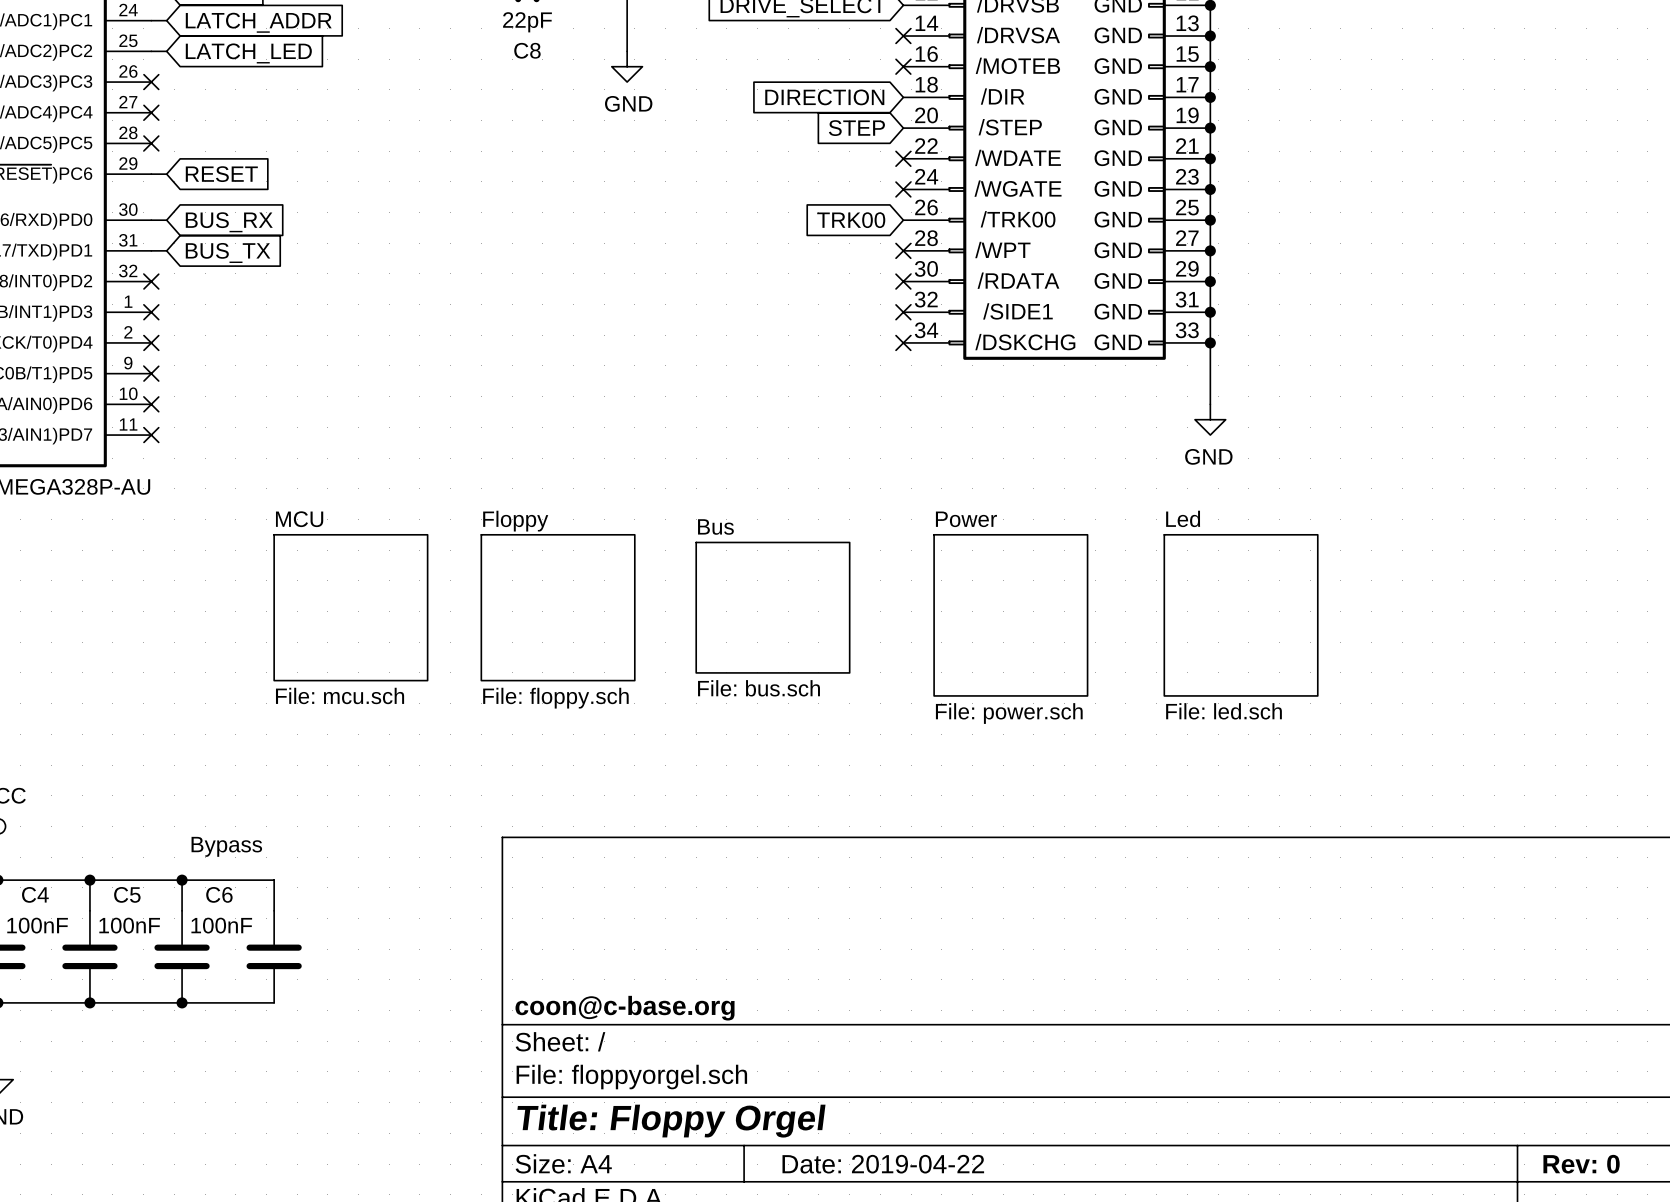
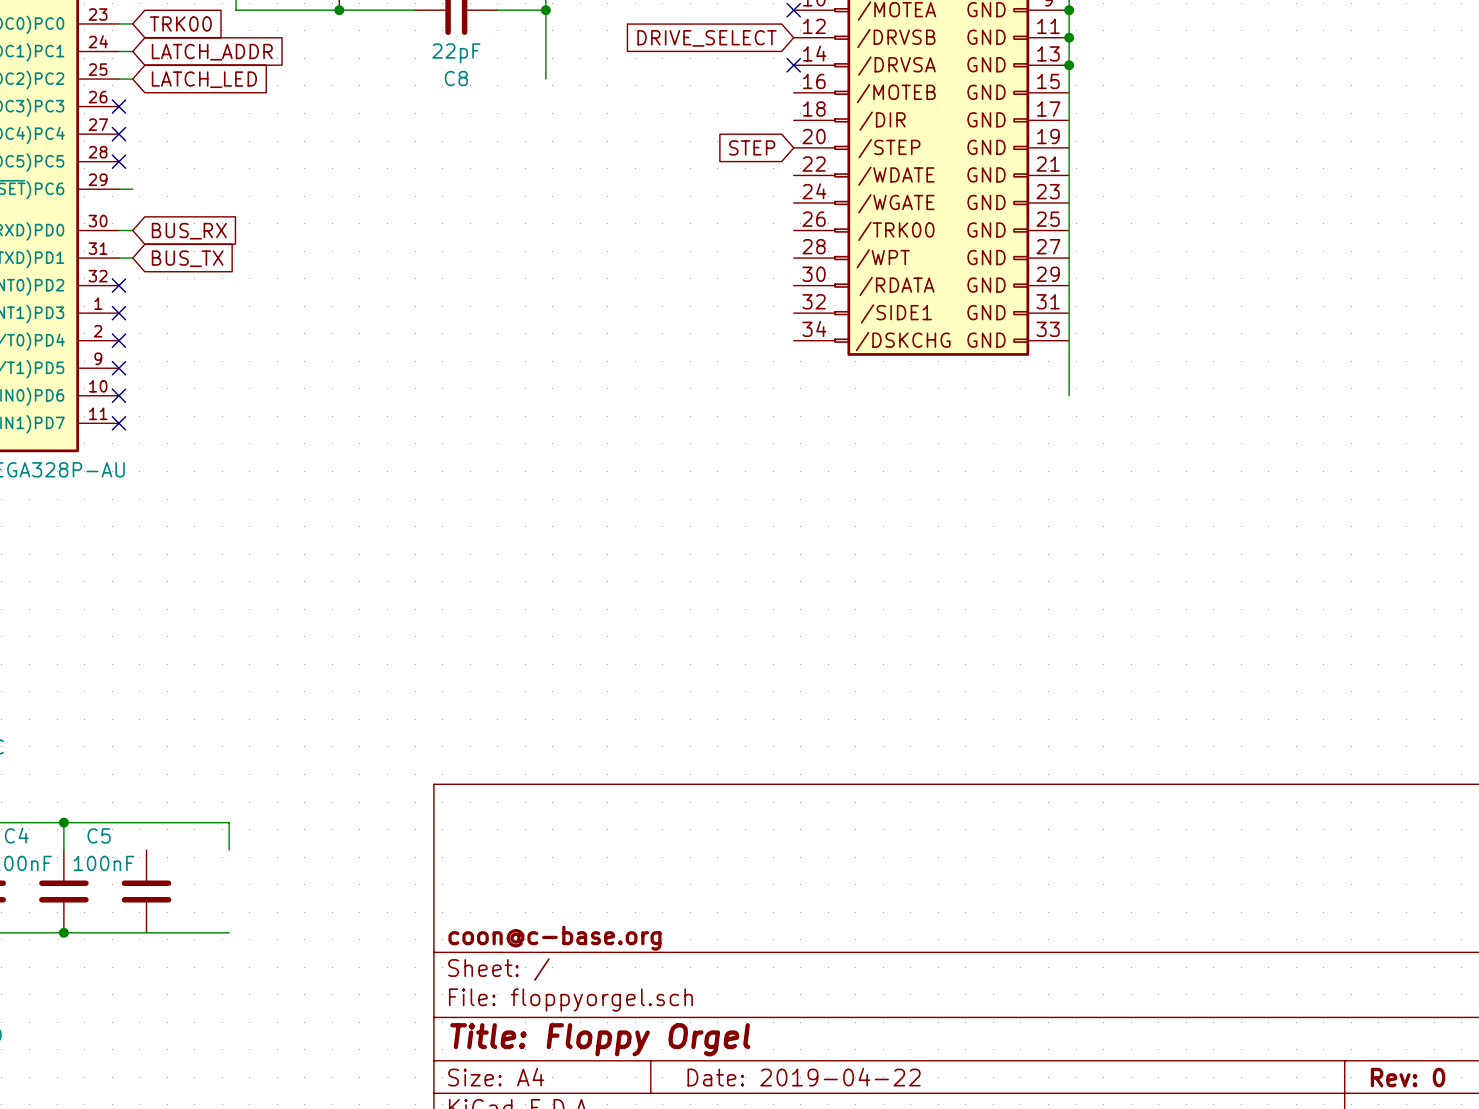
power symbol: GND (627, 66) -> none
no-connect mark: (903, 66) -> none
junction: (1210, 66) -> none
global label: DIRECTION (824, 97) -> none
junction: (1210, 97) -> none
junction: (1210, 128) -> none
no-connect mark: (903, 158) -> none
junction: (1210, 158) -> none
global label: RESET (221, 174) -> none
no-connect mark: (903, 189) -> none
junction: (1210, 189) -> none
global label: TRK00 (851, 220) -> none
junction: (1210, 220) -> none
no-connect mark: (903, 250) -> none
junction: (1210, 250) -> none
no-connect mark: (903, 281) -> none
junction: (1210, 281) -> none
no-connect mark: (903, 312) -> none
junction: (1210, 312) -> none
no-connect mark: (903, 342) -> none
junction: (1210, 342) -> none
power symbol: GND (1210, 419) -> none
sheet MCU: File: mcu.sch (350, 607) -> none
sheet Floppy: File: floppy.sch (558, 607) -> none
sheet Bus: File: bus.sch (772, 607) -> none
sheet Power: File: power.sch (1010, 615) -> none
sheet Led: File: led.sch (1241, 615) -> none
text: Bypass (226, 846) -> none
wire: (182, 880) (182, 910) -> none
junction: (182, 880) -> none
C6: 100nF (274, 956) -> none
junction: (182, 1002) -> none

